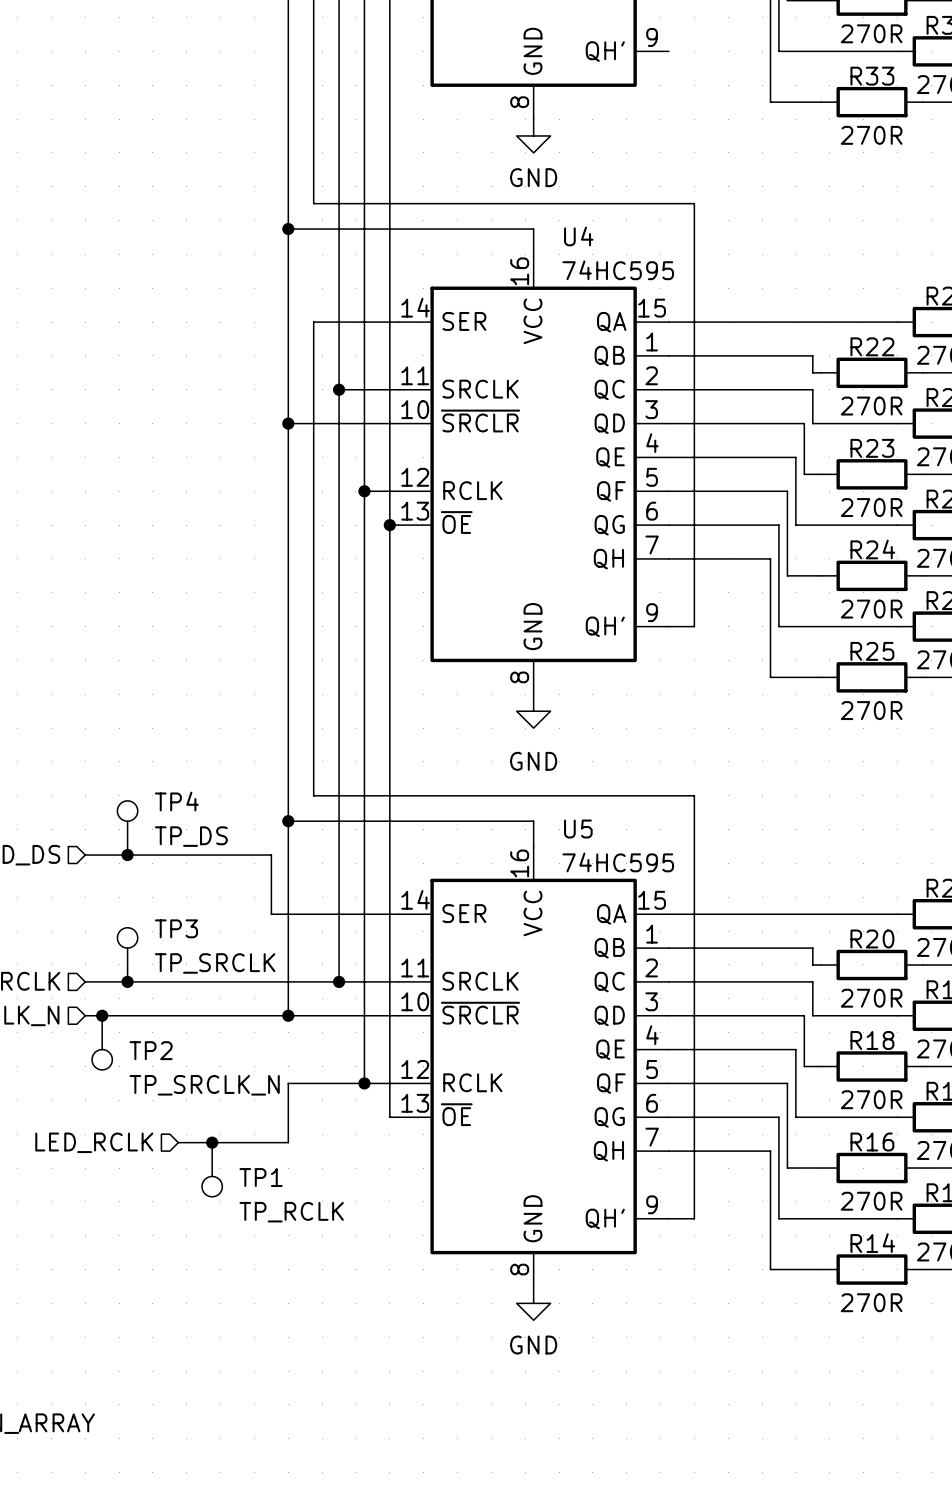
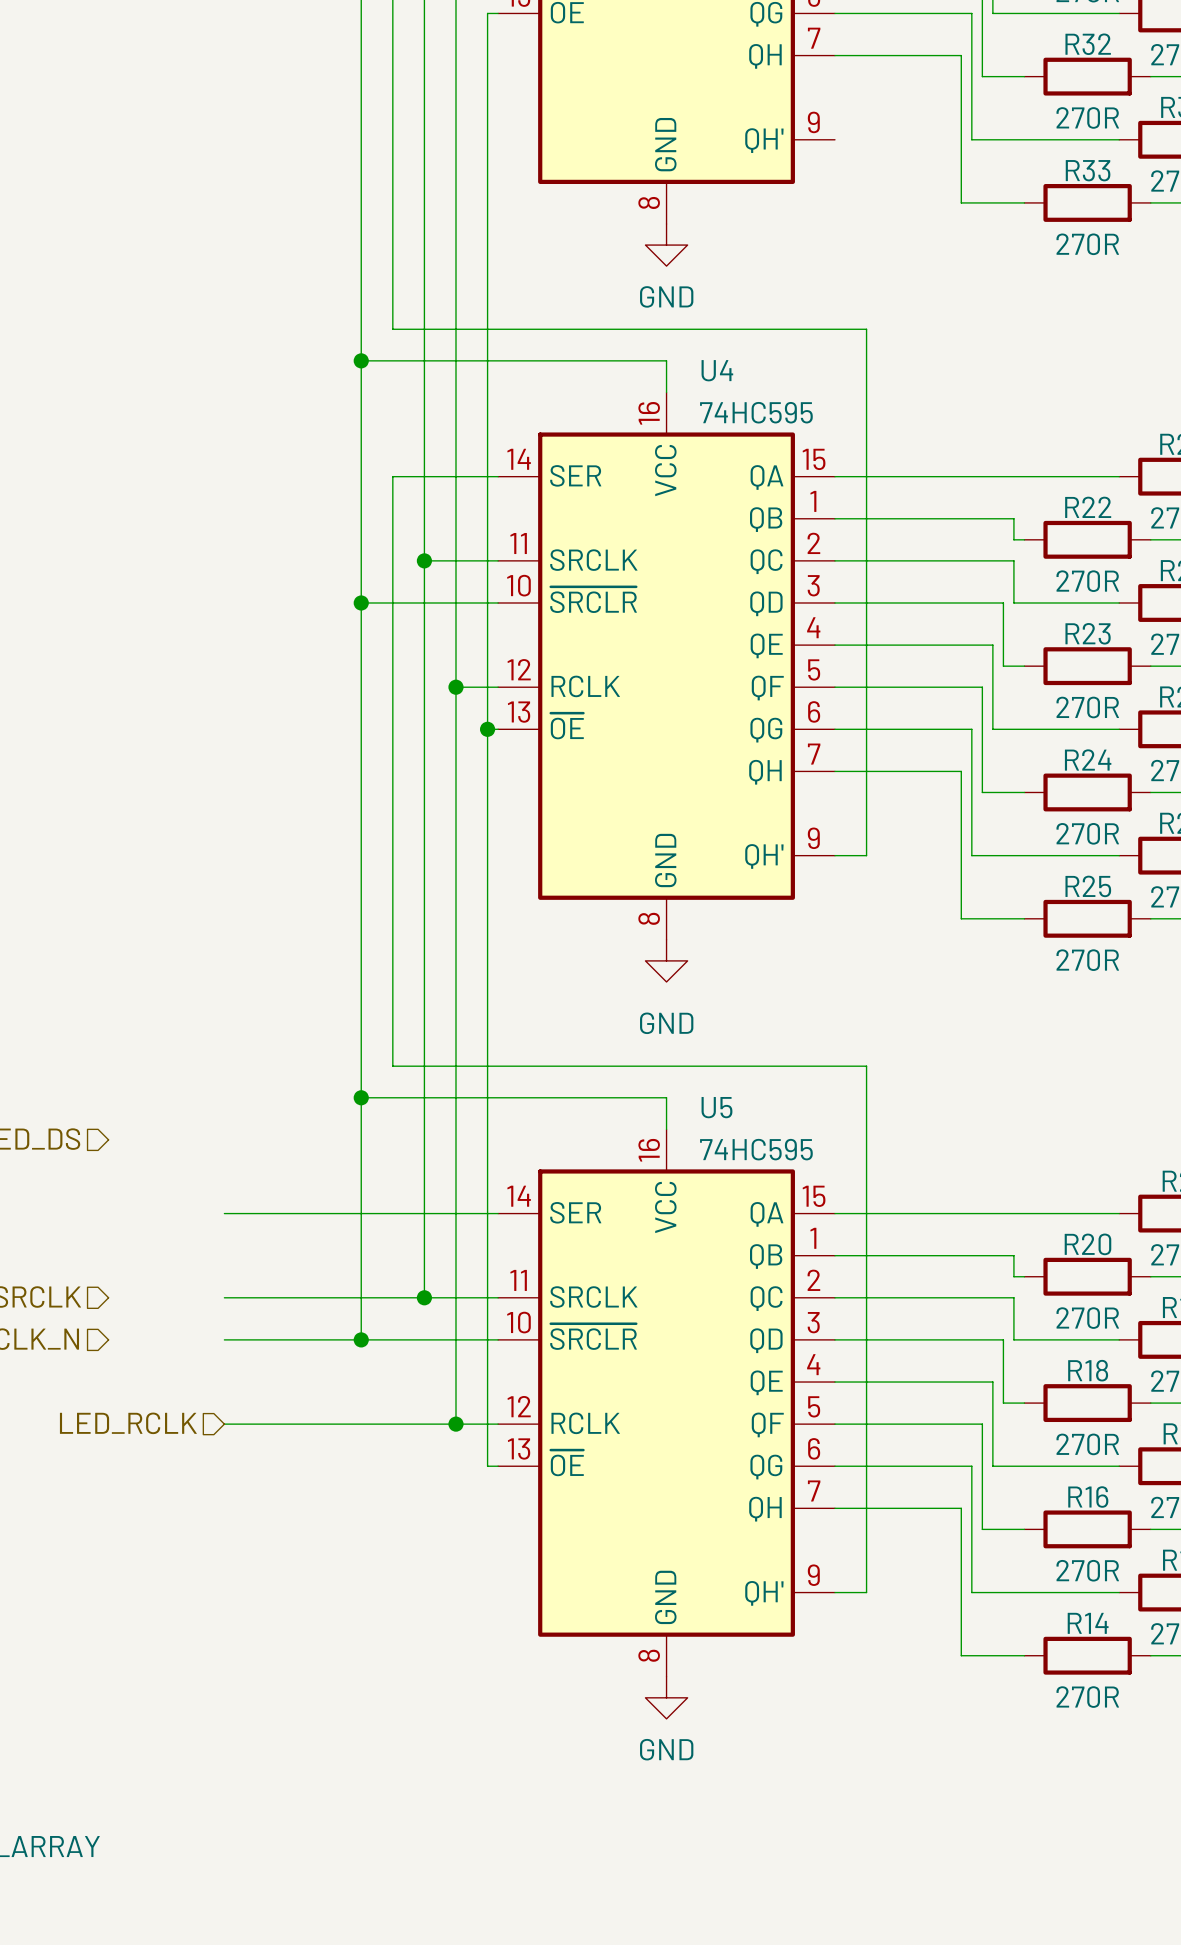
TP4: TP_DS (127, 827) -> none
wire: (85, 855) (271, 855) (271, 914) -> (224, 1213) (340, 1213)
junction: (127, 855) -> none
TP3: TP_SRCLK (127, 954) -> none
wire: (85, 981) (178, 981) -> none
junction: (127, 981) -> none
wire: (85, 1015) (178, 1015) -> none
junction: (102, 1015) -> none
TP2: TP_SRCLK_N (102, 1042) -> none
wire: (288, 1083) (288, 1142) (178, 1142) -> (361, 1424) (224, 1424)
hierarchical label position: LED_RCLK (94, 1142) -> LED_RCLK (128, 1423)
junction: (212, 1142) -> none
TP1: TP_RCLK (212, 1169) -> none

